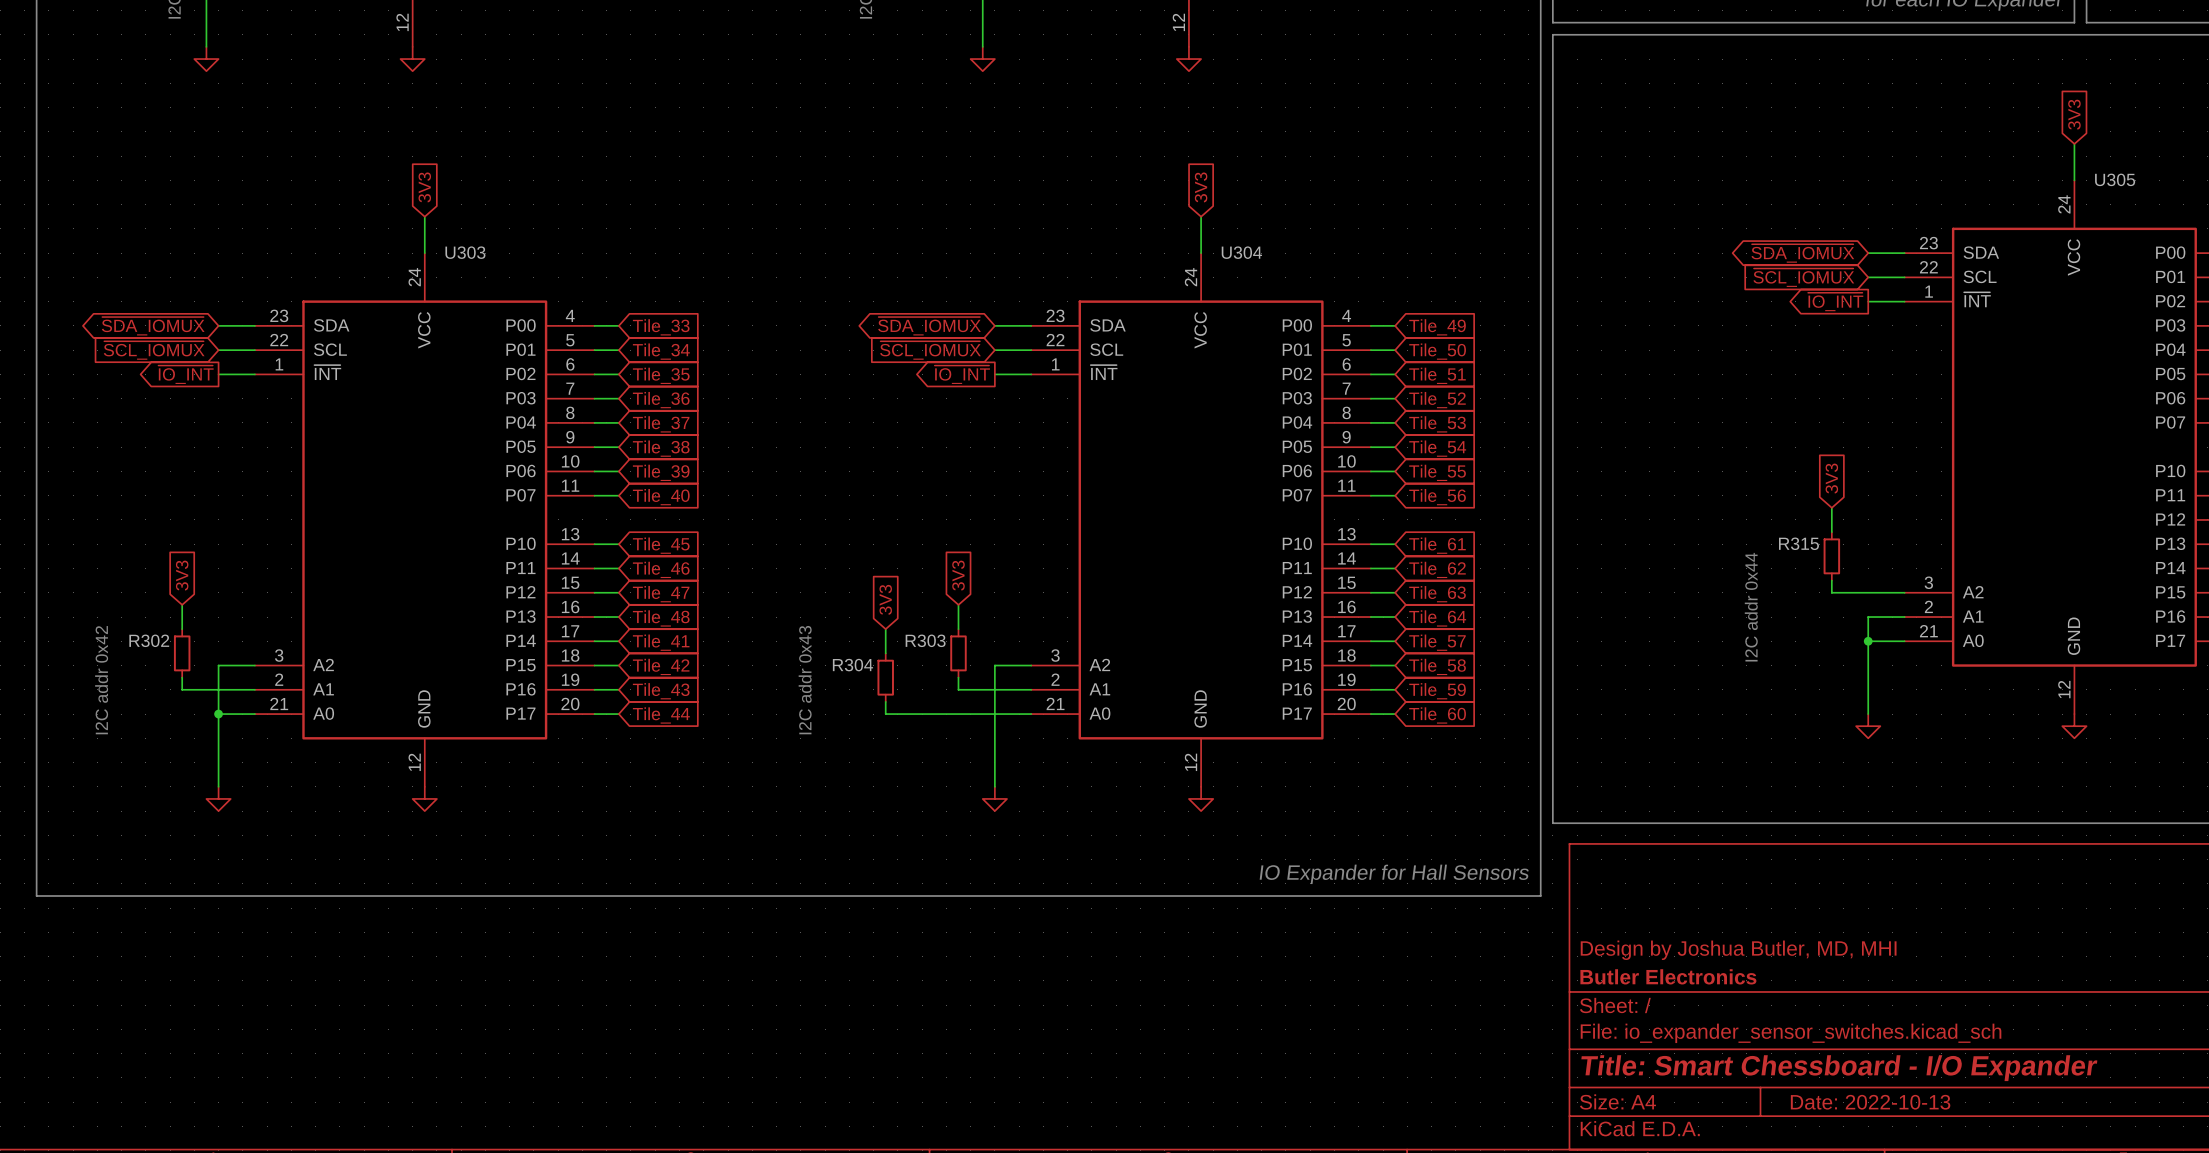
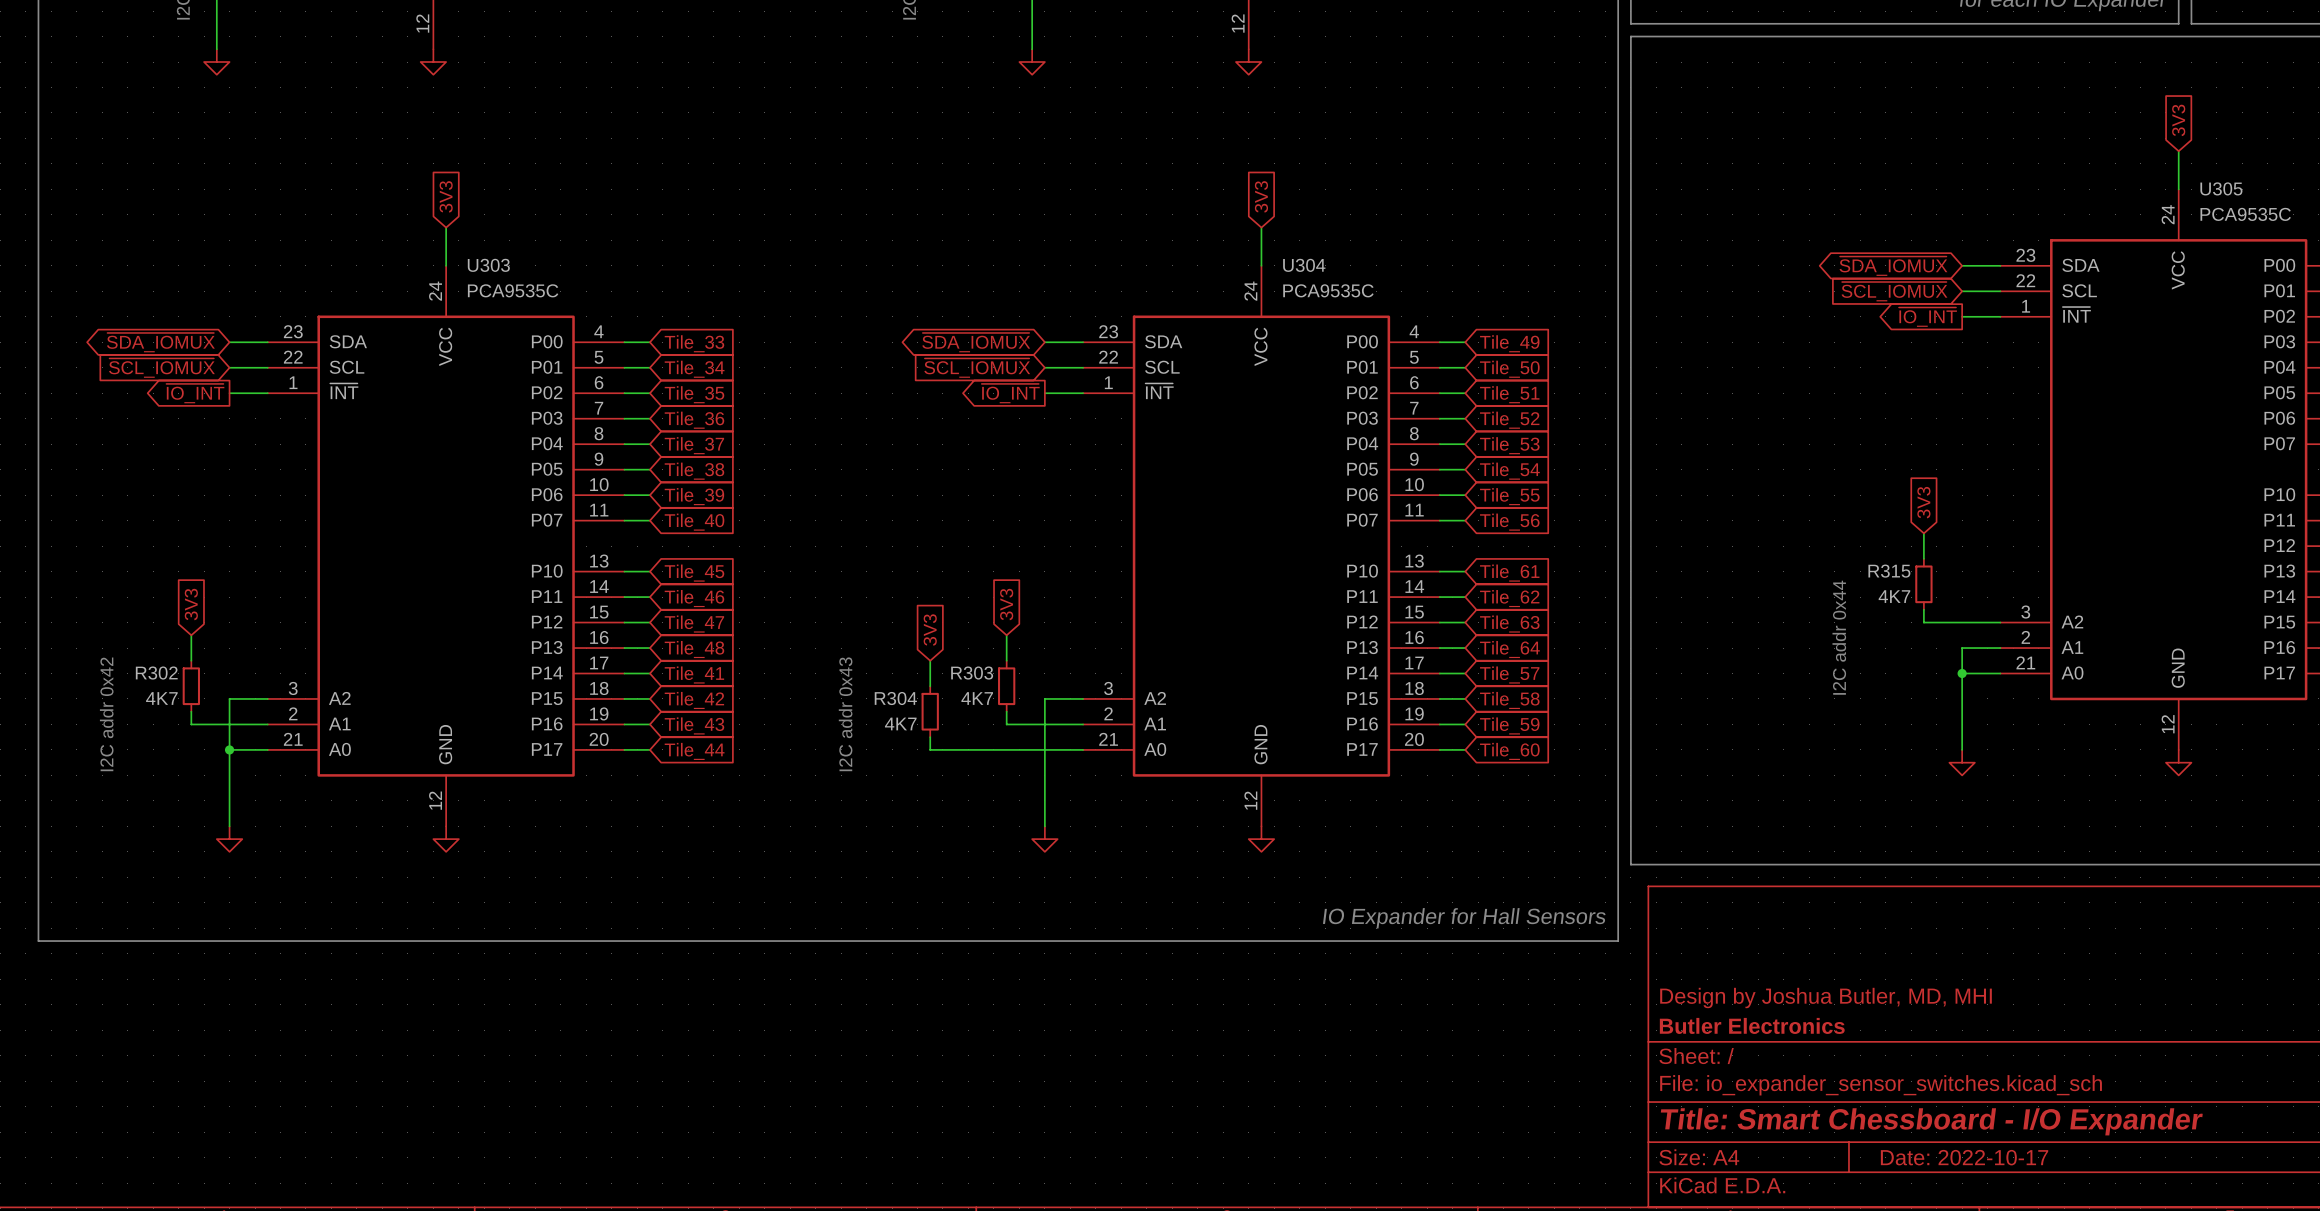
U305 value: none -> PCA9535C (2245, 214)
U303 value: none -> PCA9535C (513, 290)
U304 value: none -> PCA9535C (1328, 290)
R315 value: none -> 4K7 (1894, 596)
R302 value: none -> 4K7 (161, 698)
R303 value: none -> 4K7 (977, 698)
R304 value: none -> 4K7 (900, 723)
title block: Date: 2022-10-13 (1870, 1102) -> Date: 2022-10-17 (1964, 1157)

